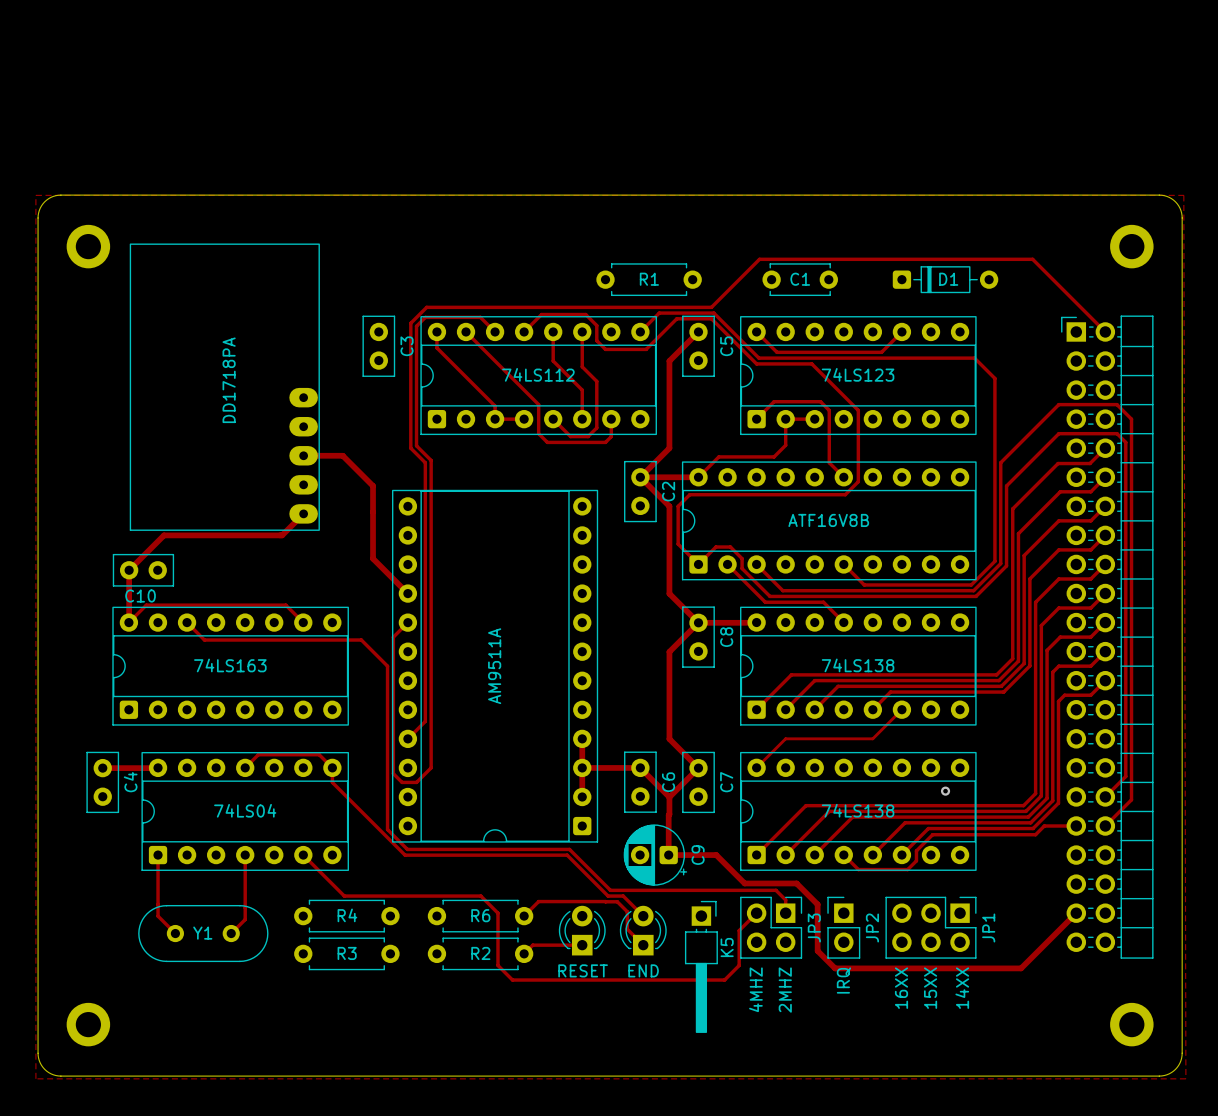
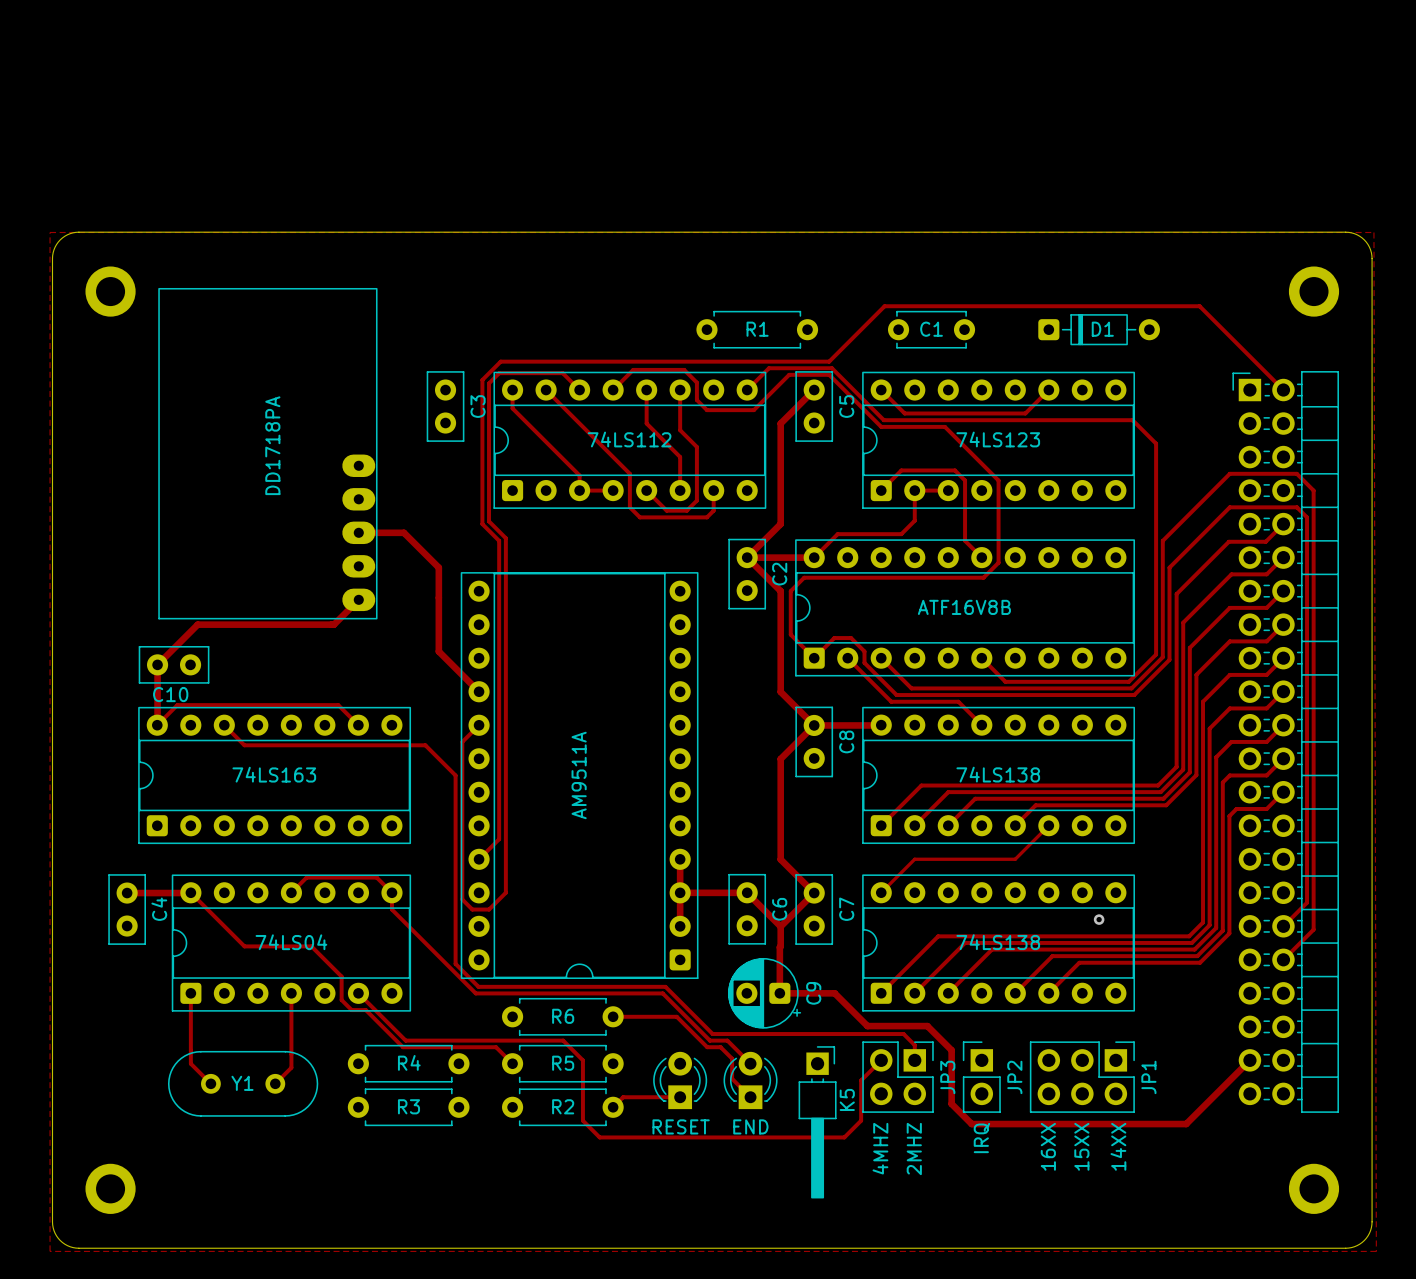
track: none -> (190, 892) (244, 946) (311, 946) (341, 976) (341, 1000) (351, 1010) (365, 1010) (403, 1047) (496, 1047) (512, 1063)
track: (1076, 826) (1044, 826) (1035, 834) (932, 834) (916, 850) (916, 860) (907, 869) (858, 869) (843, 855) -> none
R6: none -> (562, 1016)
track: (605, 901) (538, 901) (524, 916) -> (706, 1046) (676, 1016) (613, 1016)
R6 name: R6 (480, 915) -> R5 (563, 1063)

